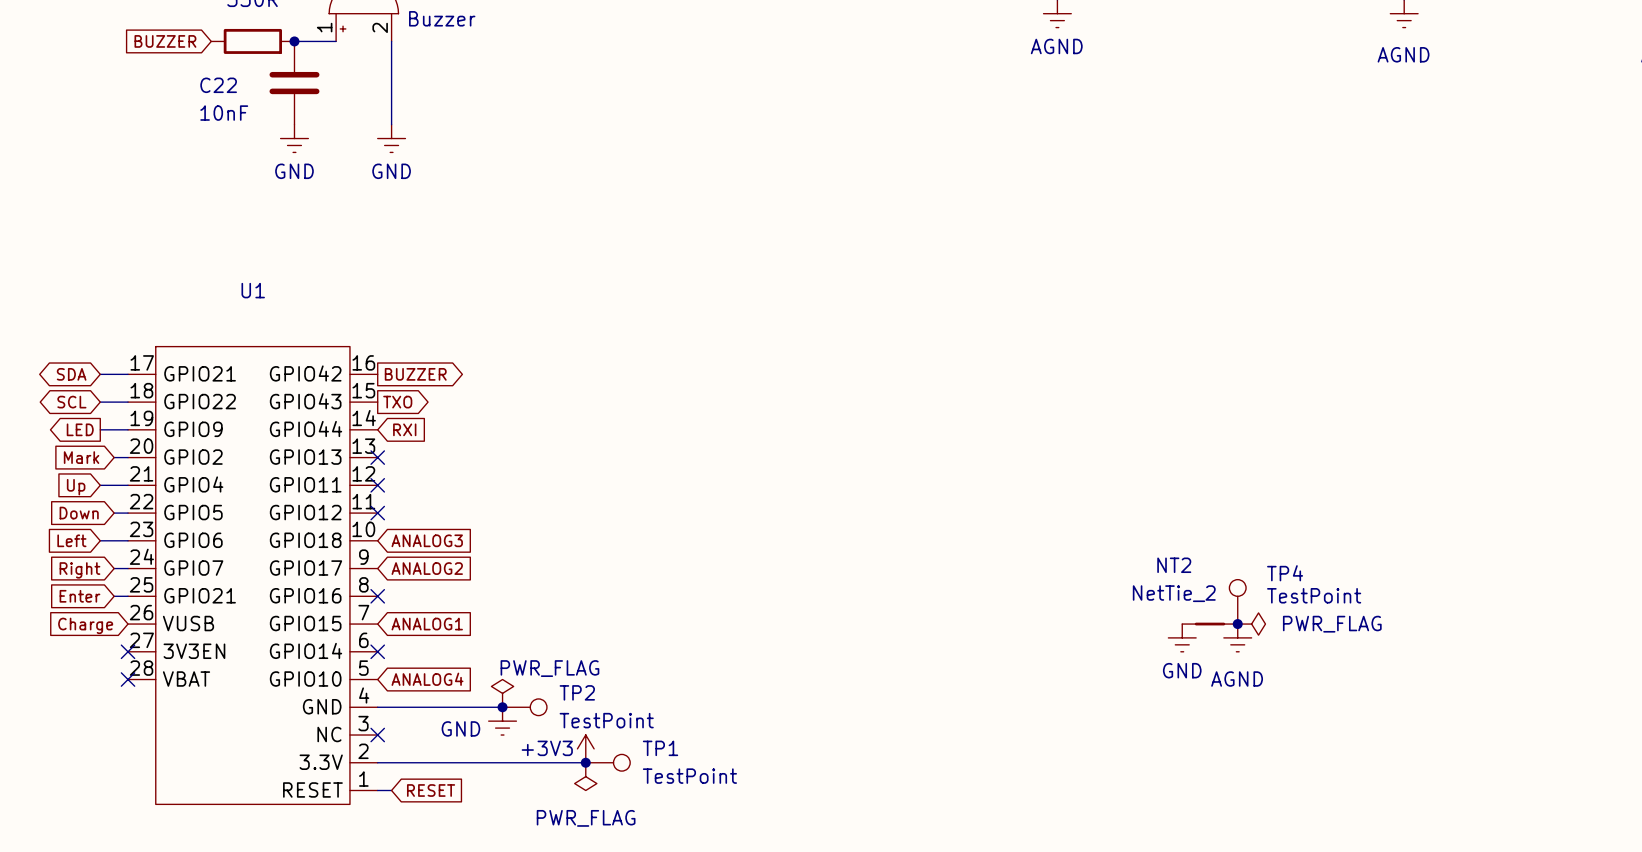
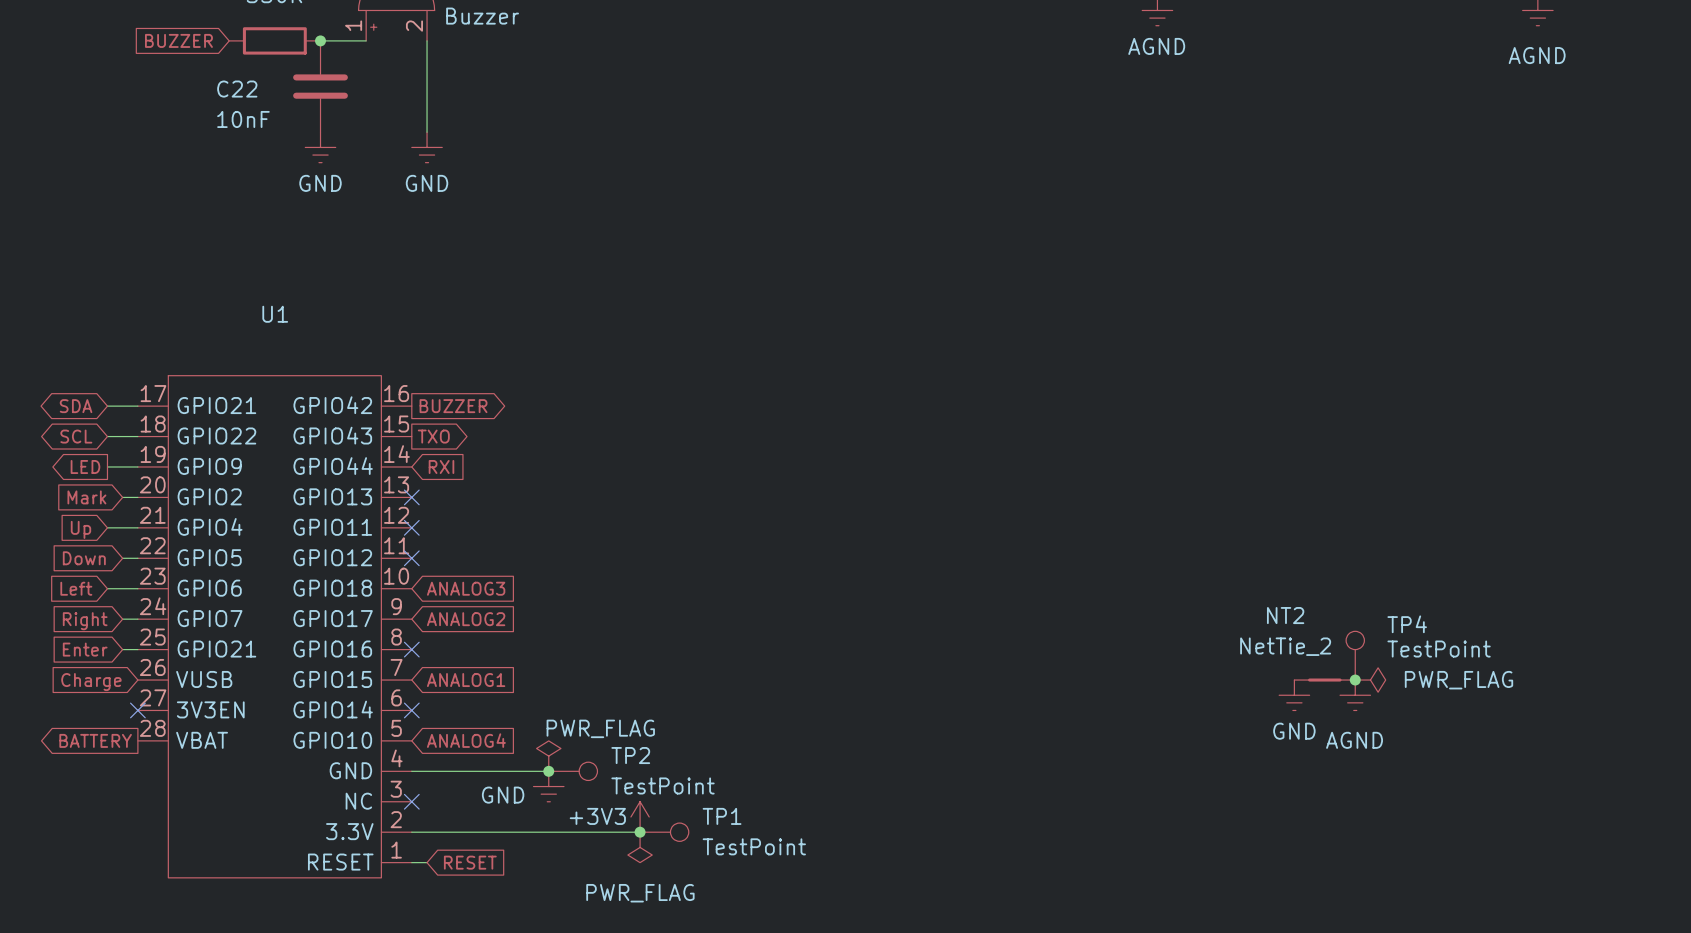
global label: none -> BATTERY (95, 740)
no-connect mark: (128, 679) -> none

